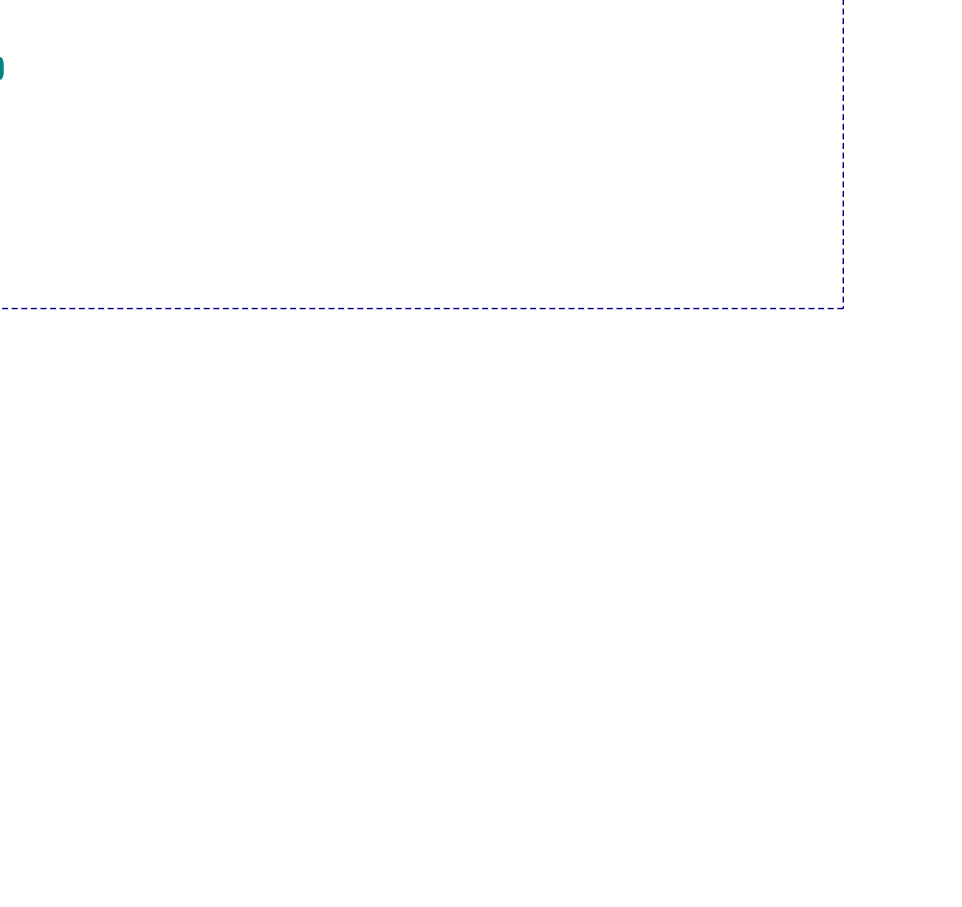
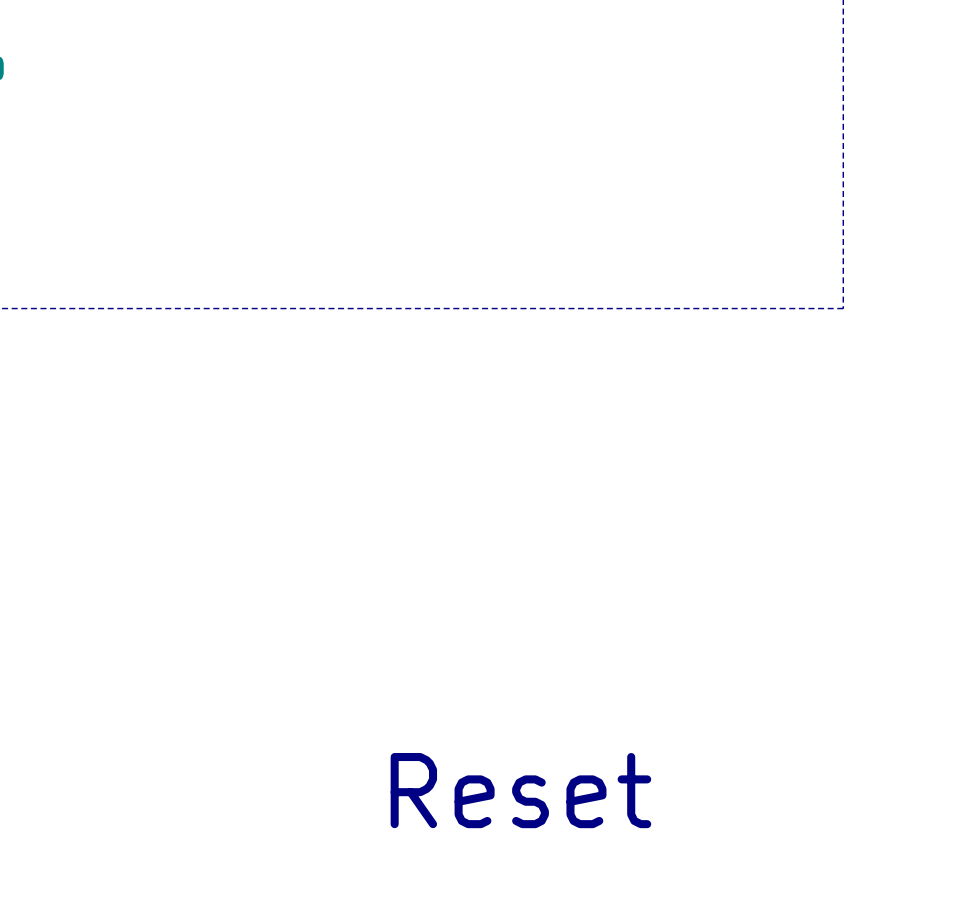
text: none -> Reset (520, 790)

